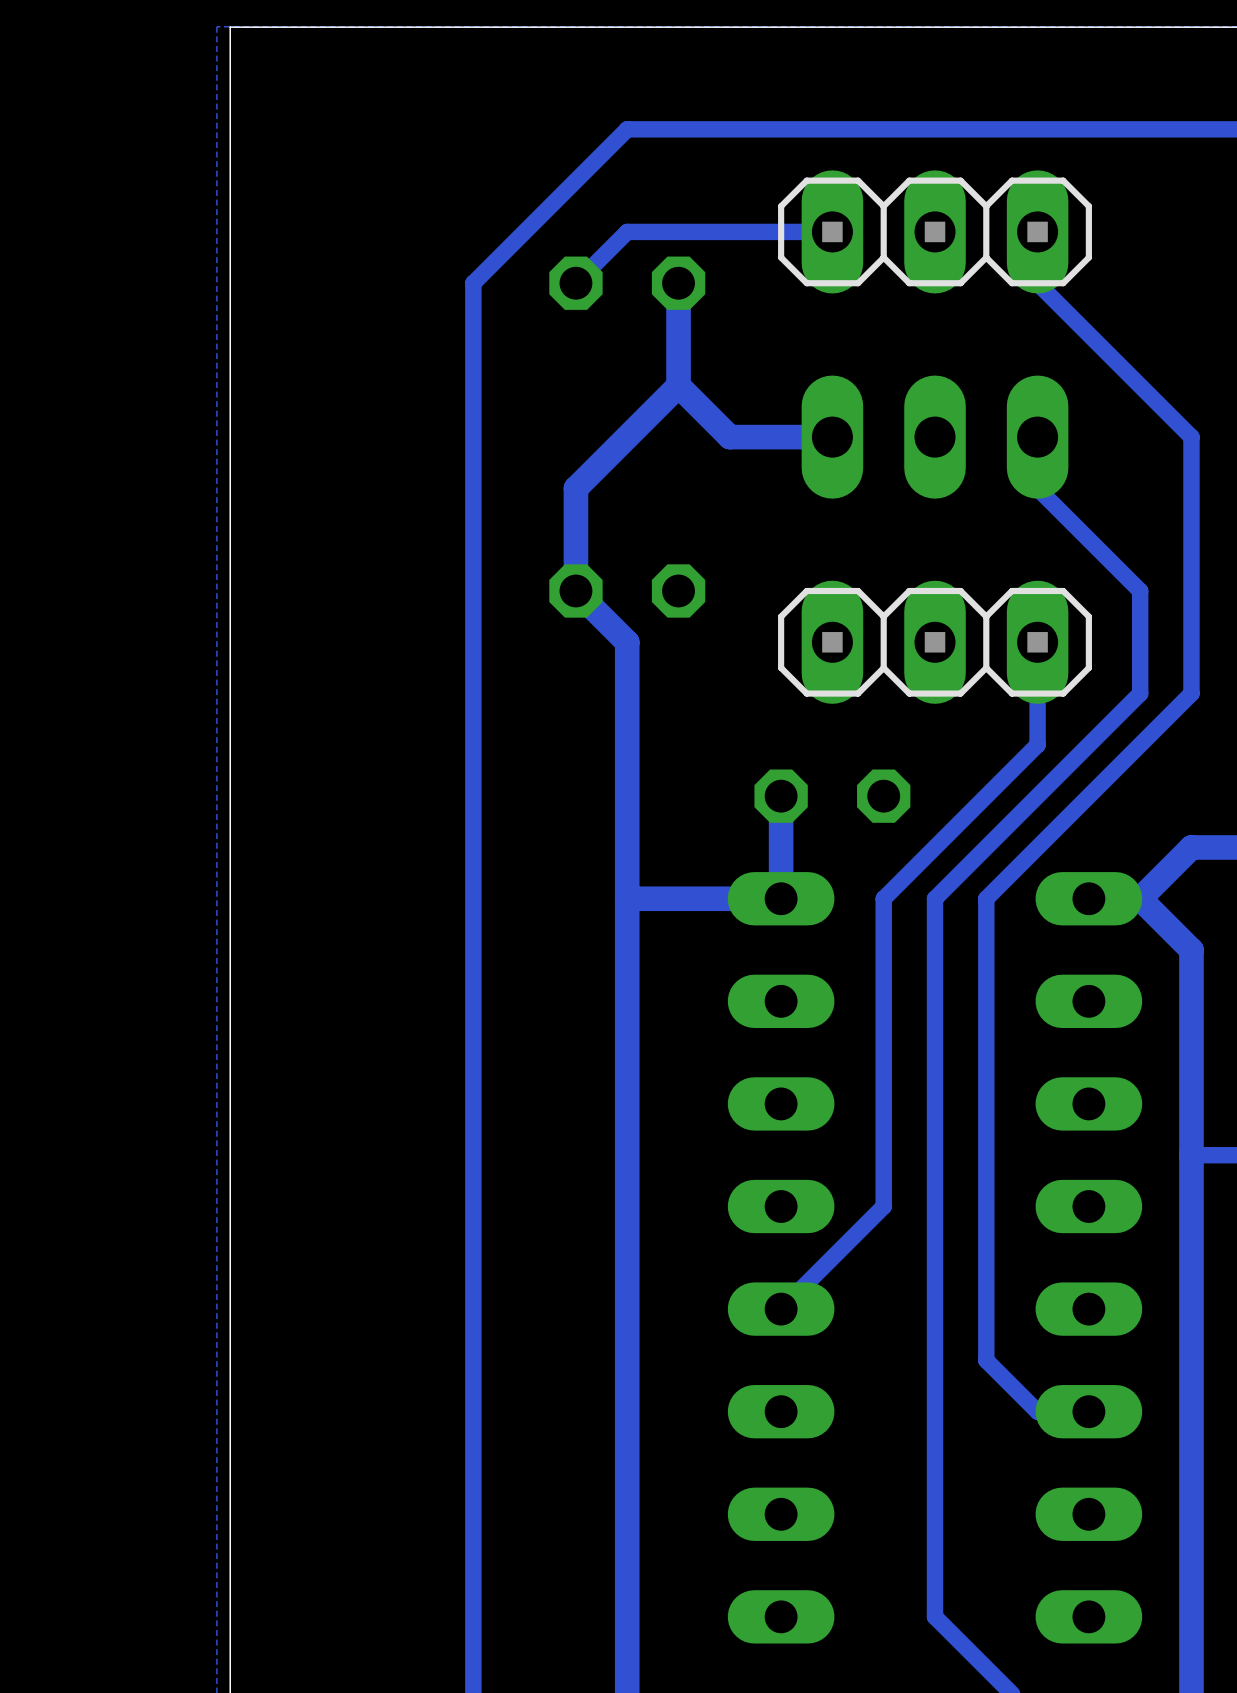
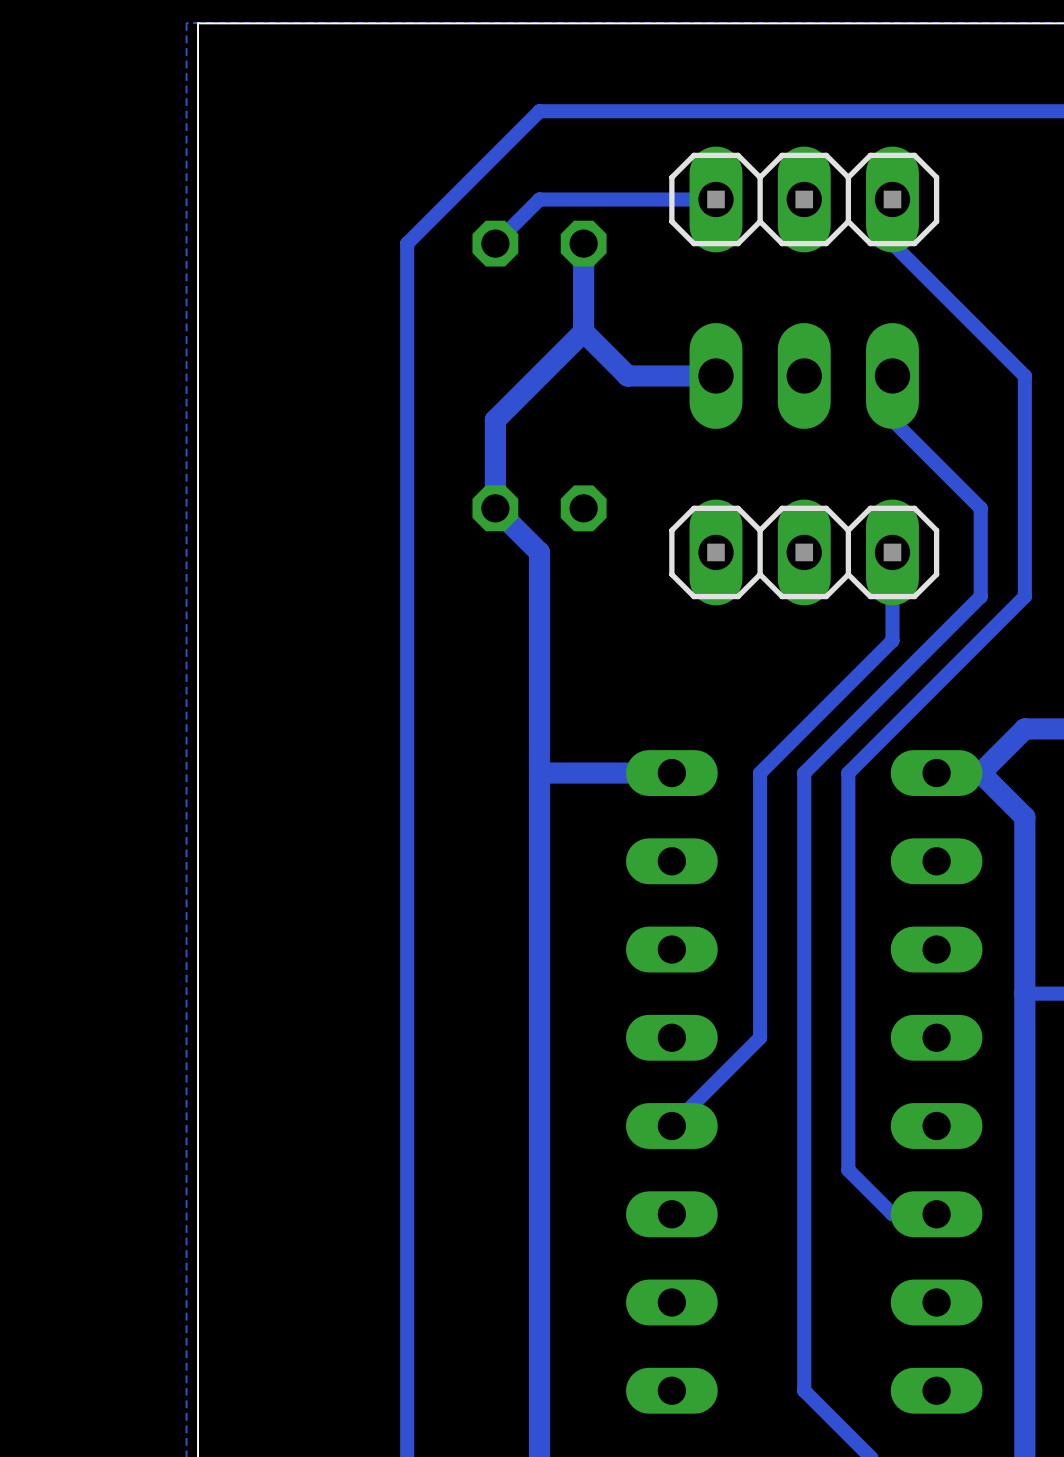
track: (781, 796) (781, 898) -> none
part: (832, 796) -> none

